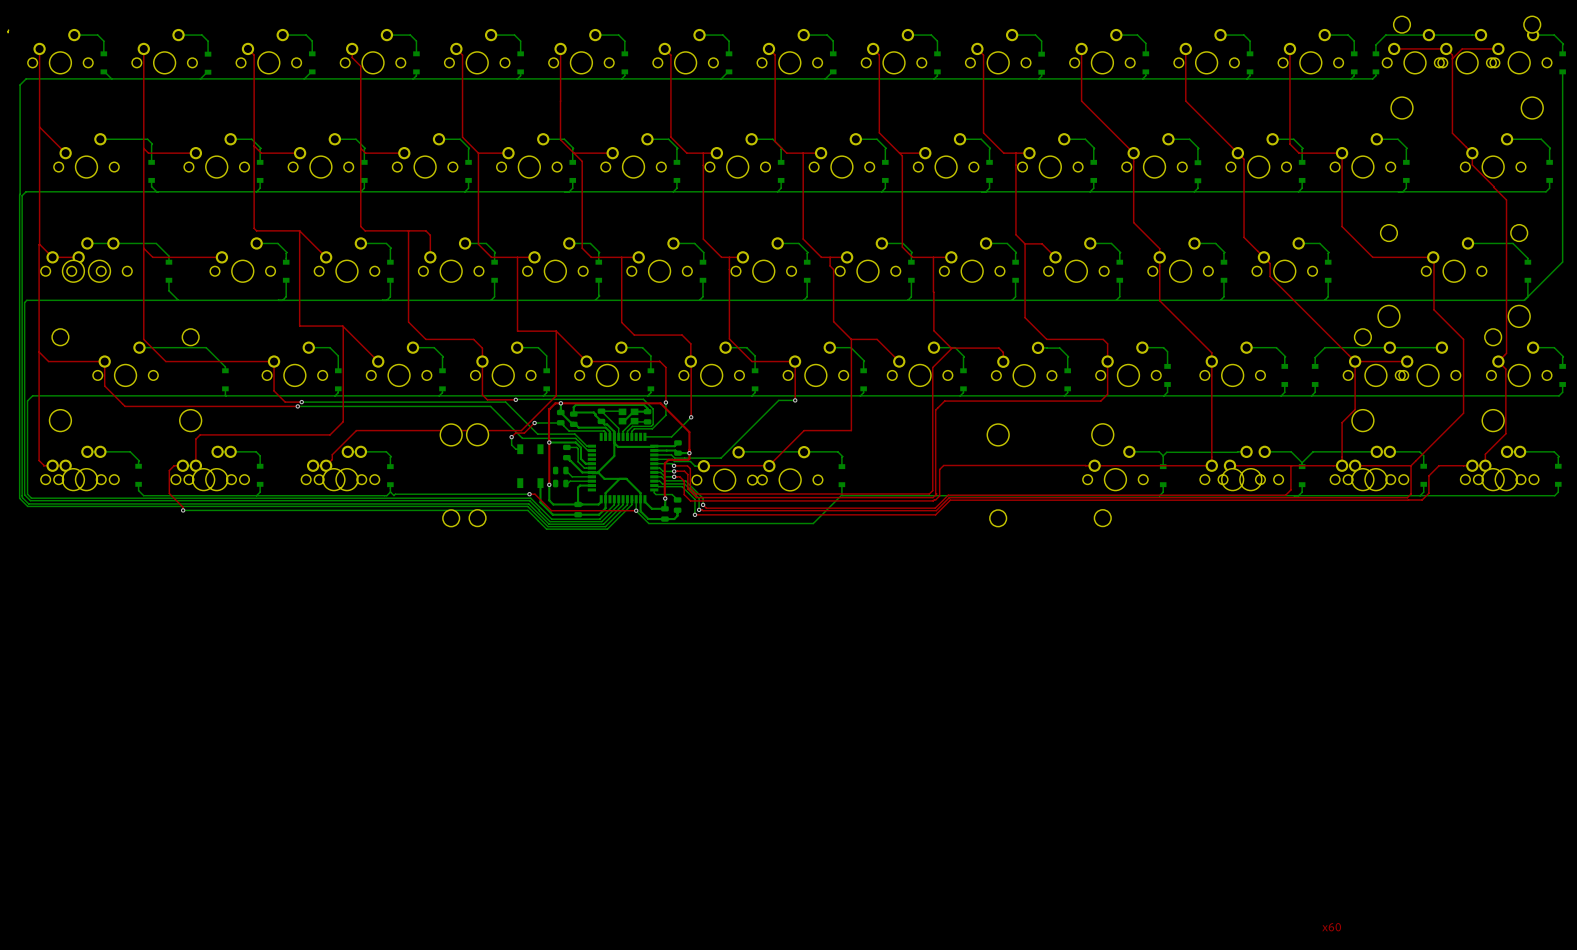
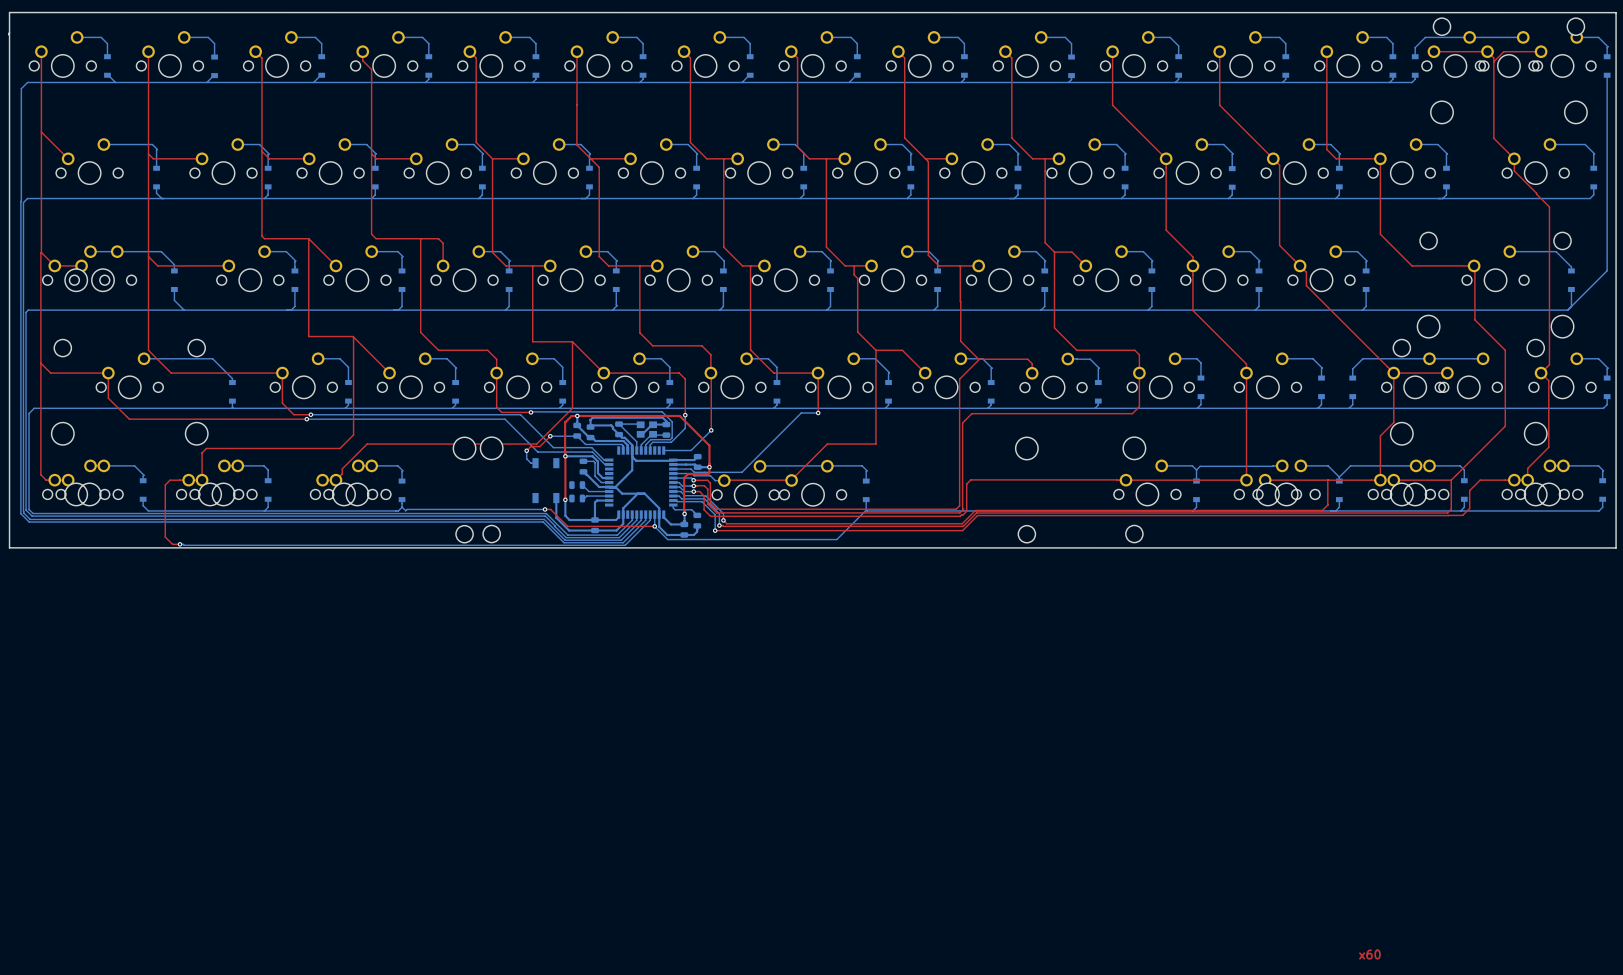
board edge: none -> (9, 12) (1616, 12) (1616, 547) (9, 547) (9, 12)
top track: (174, 465) (169, 470) (169, 493) (183, 507) (183, 510) -> (179, 480) (170, 480) (165, 484) (165, 537) (172, 544) (180, 544)
bottom track: (183, 510) (527, 510) (546, 529) -> (180, 544) (562, 545)
via position: (183, 510) -> (180, 544)

